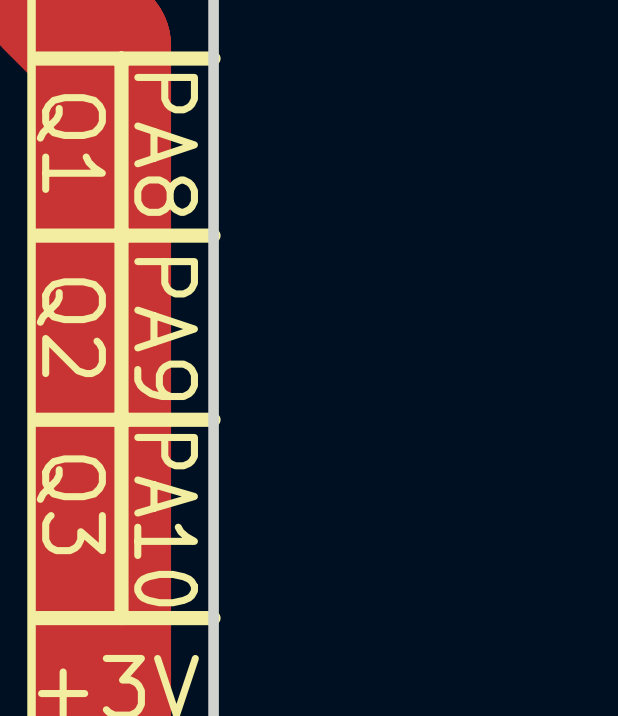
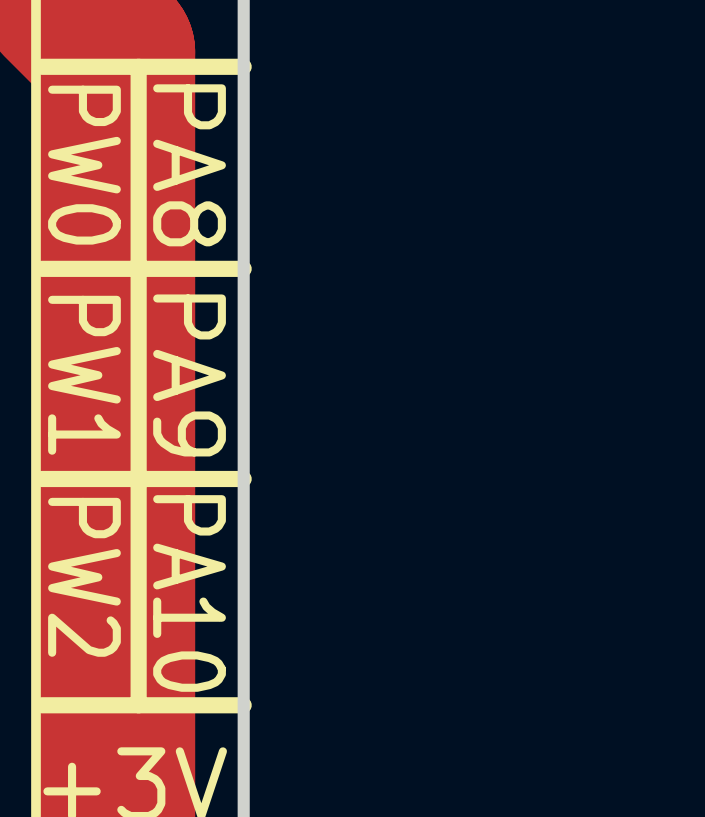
text: Q1 (71, 143) -> PW0 (84, 165)
text: Q2 (71, 327) -> PW1 (84, 375)
text: Q3 (71, 504) -> PW2 (84, 577)

